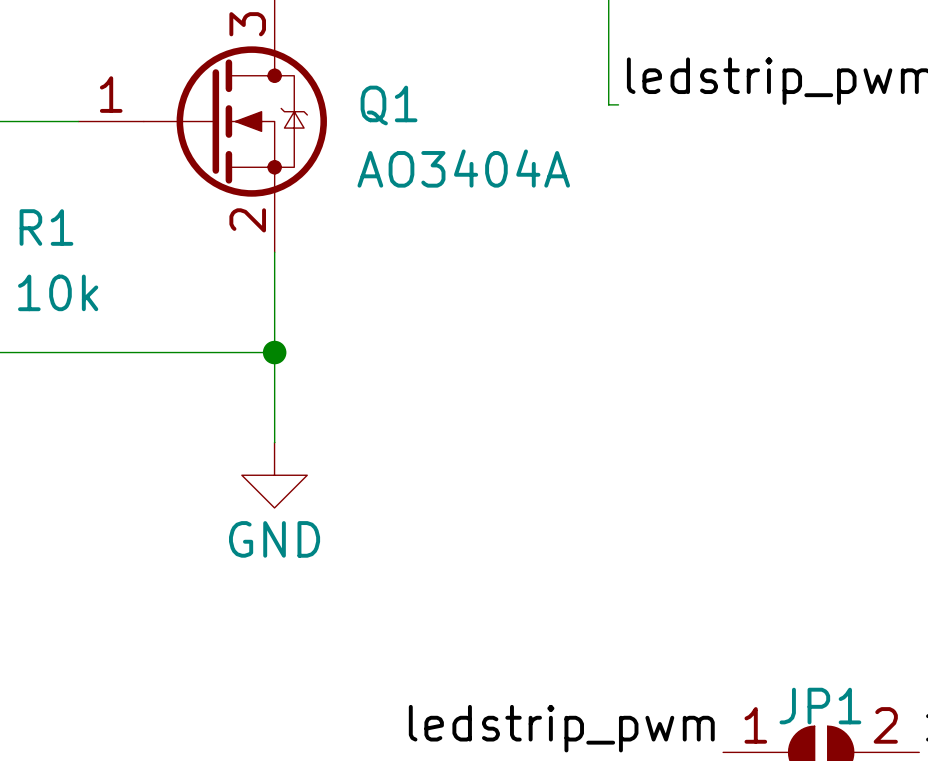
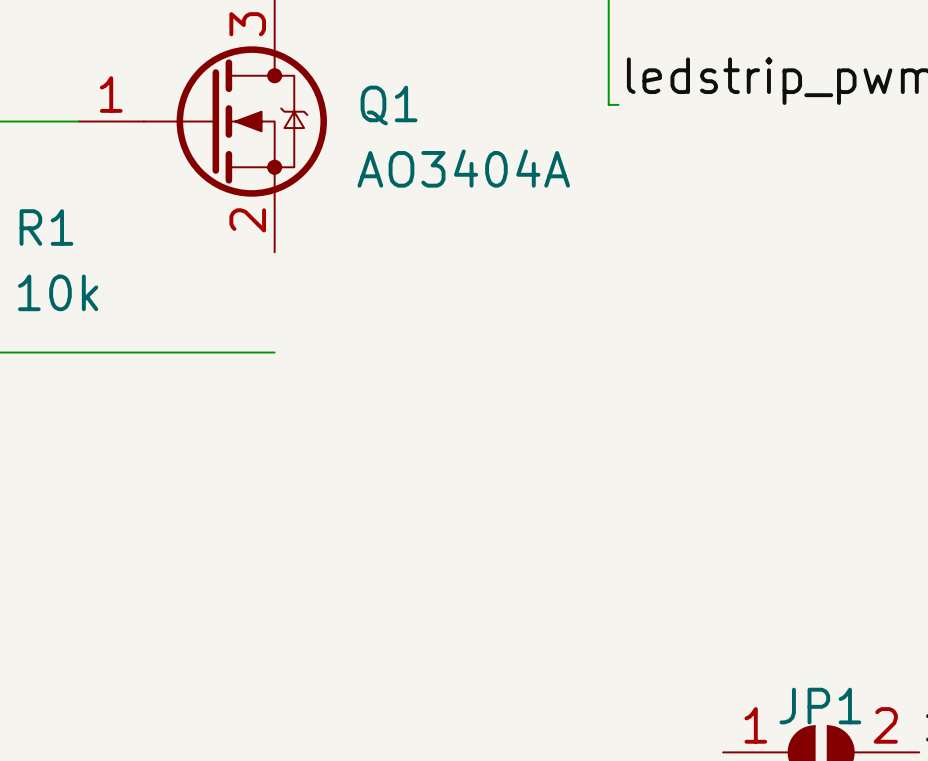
wire: (274, 252) (274, 442) -> none
junction: (274, 352) -> none
power symbol: GND (274, 475) -> none
label: ledstrip_pwm (561, 728) -> none

